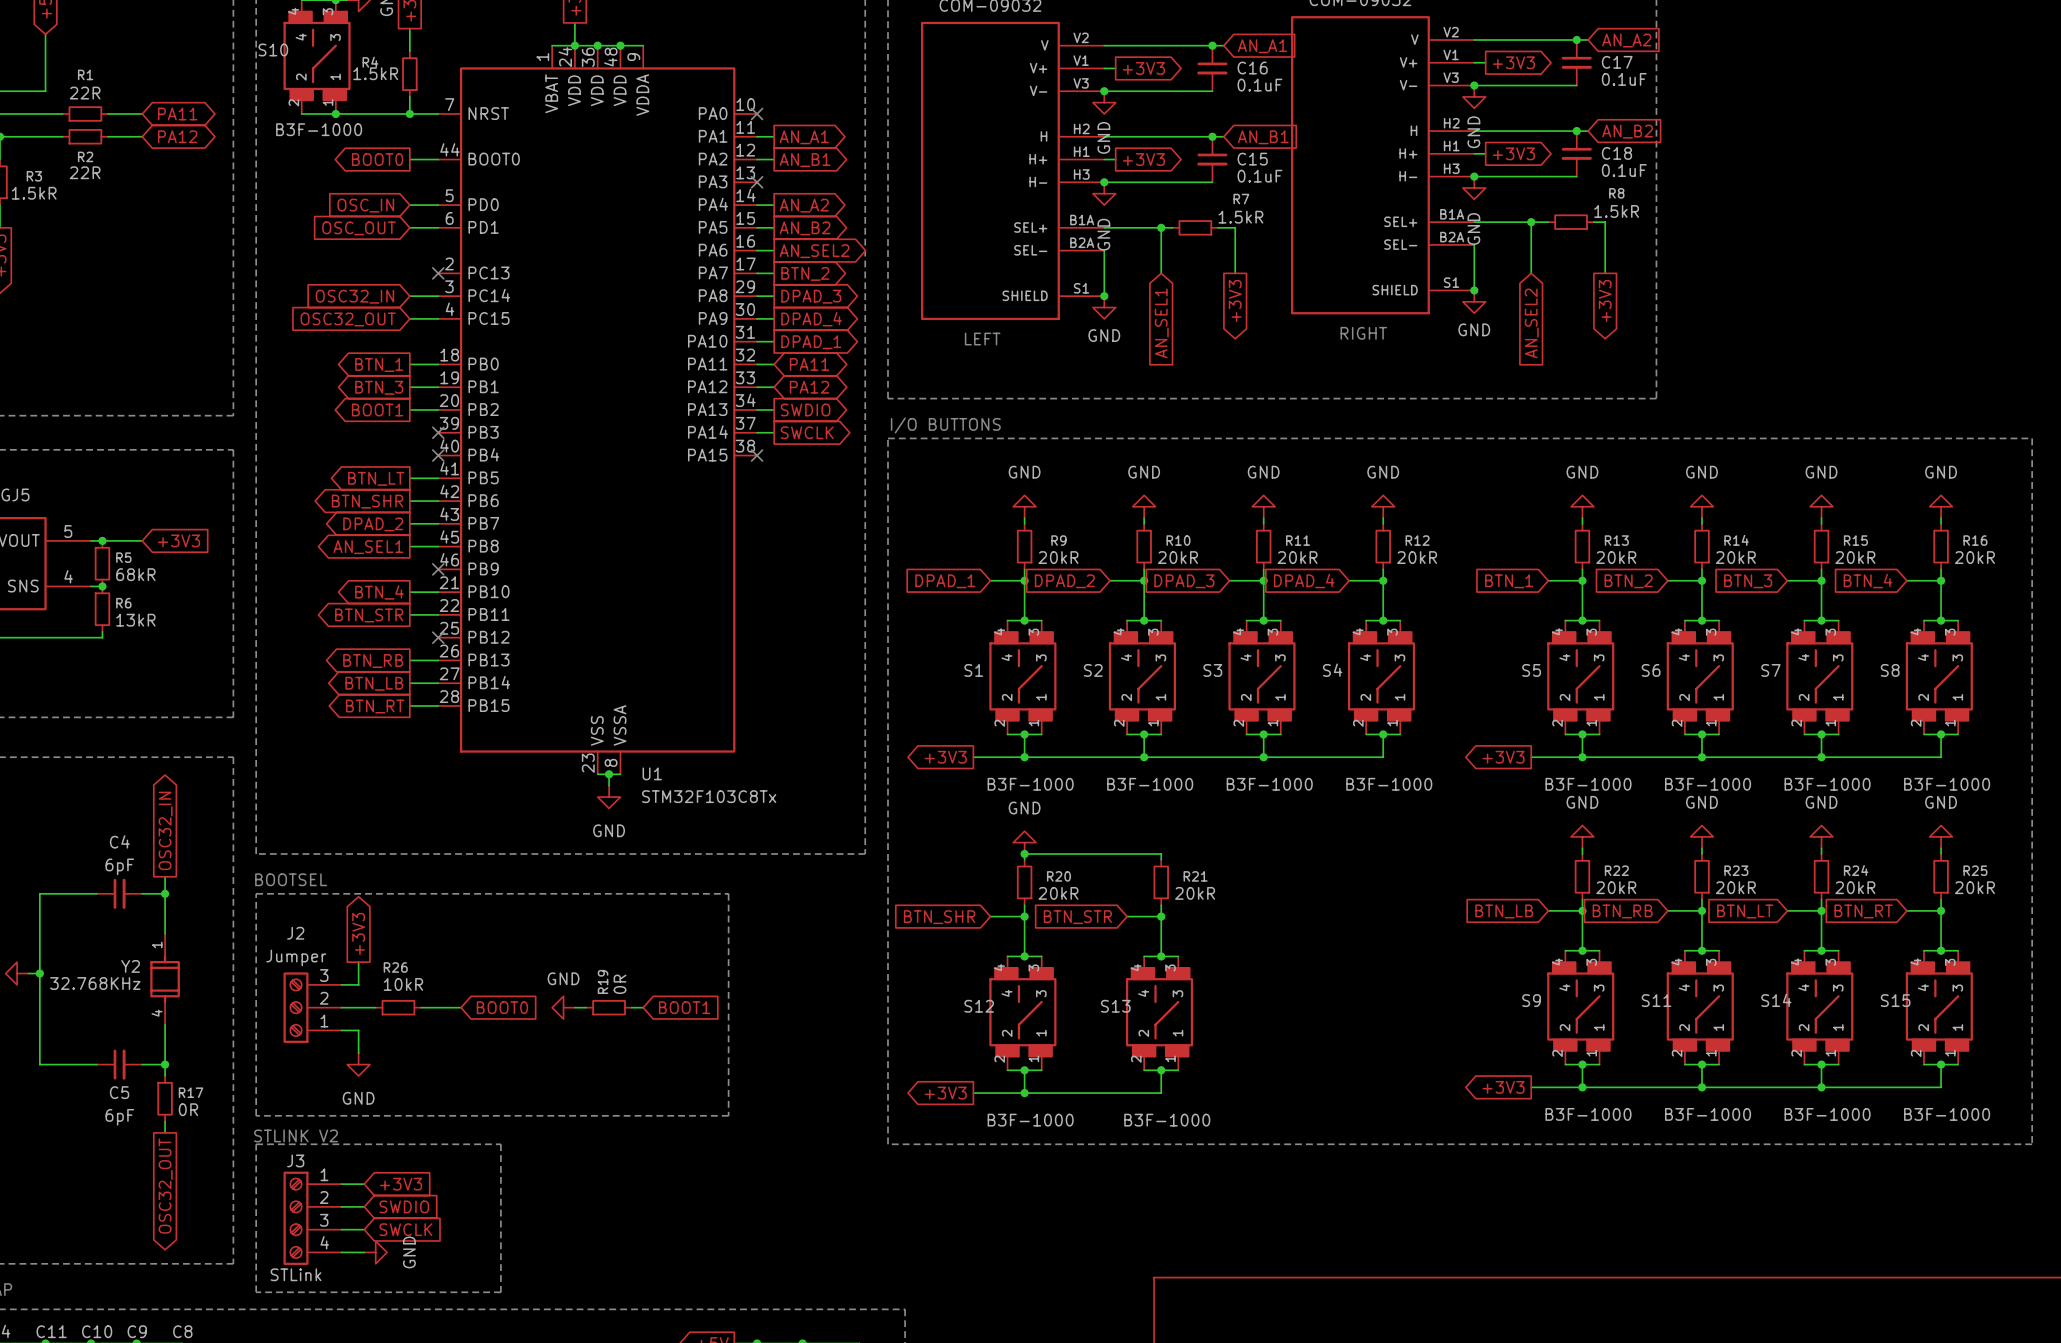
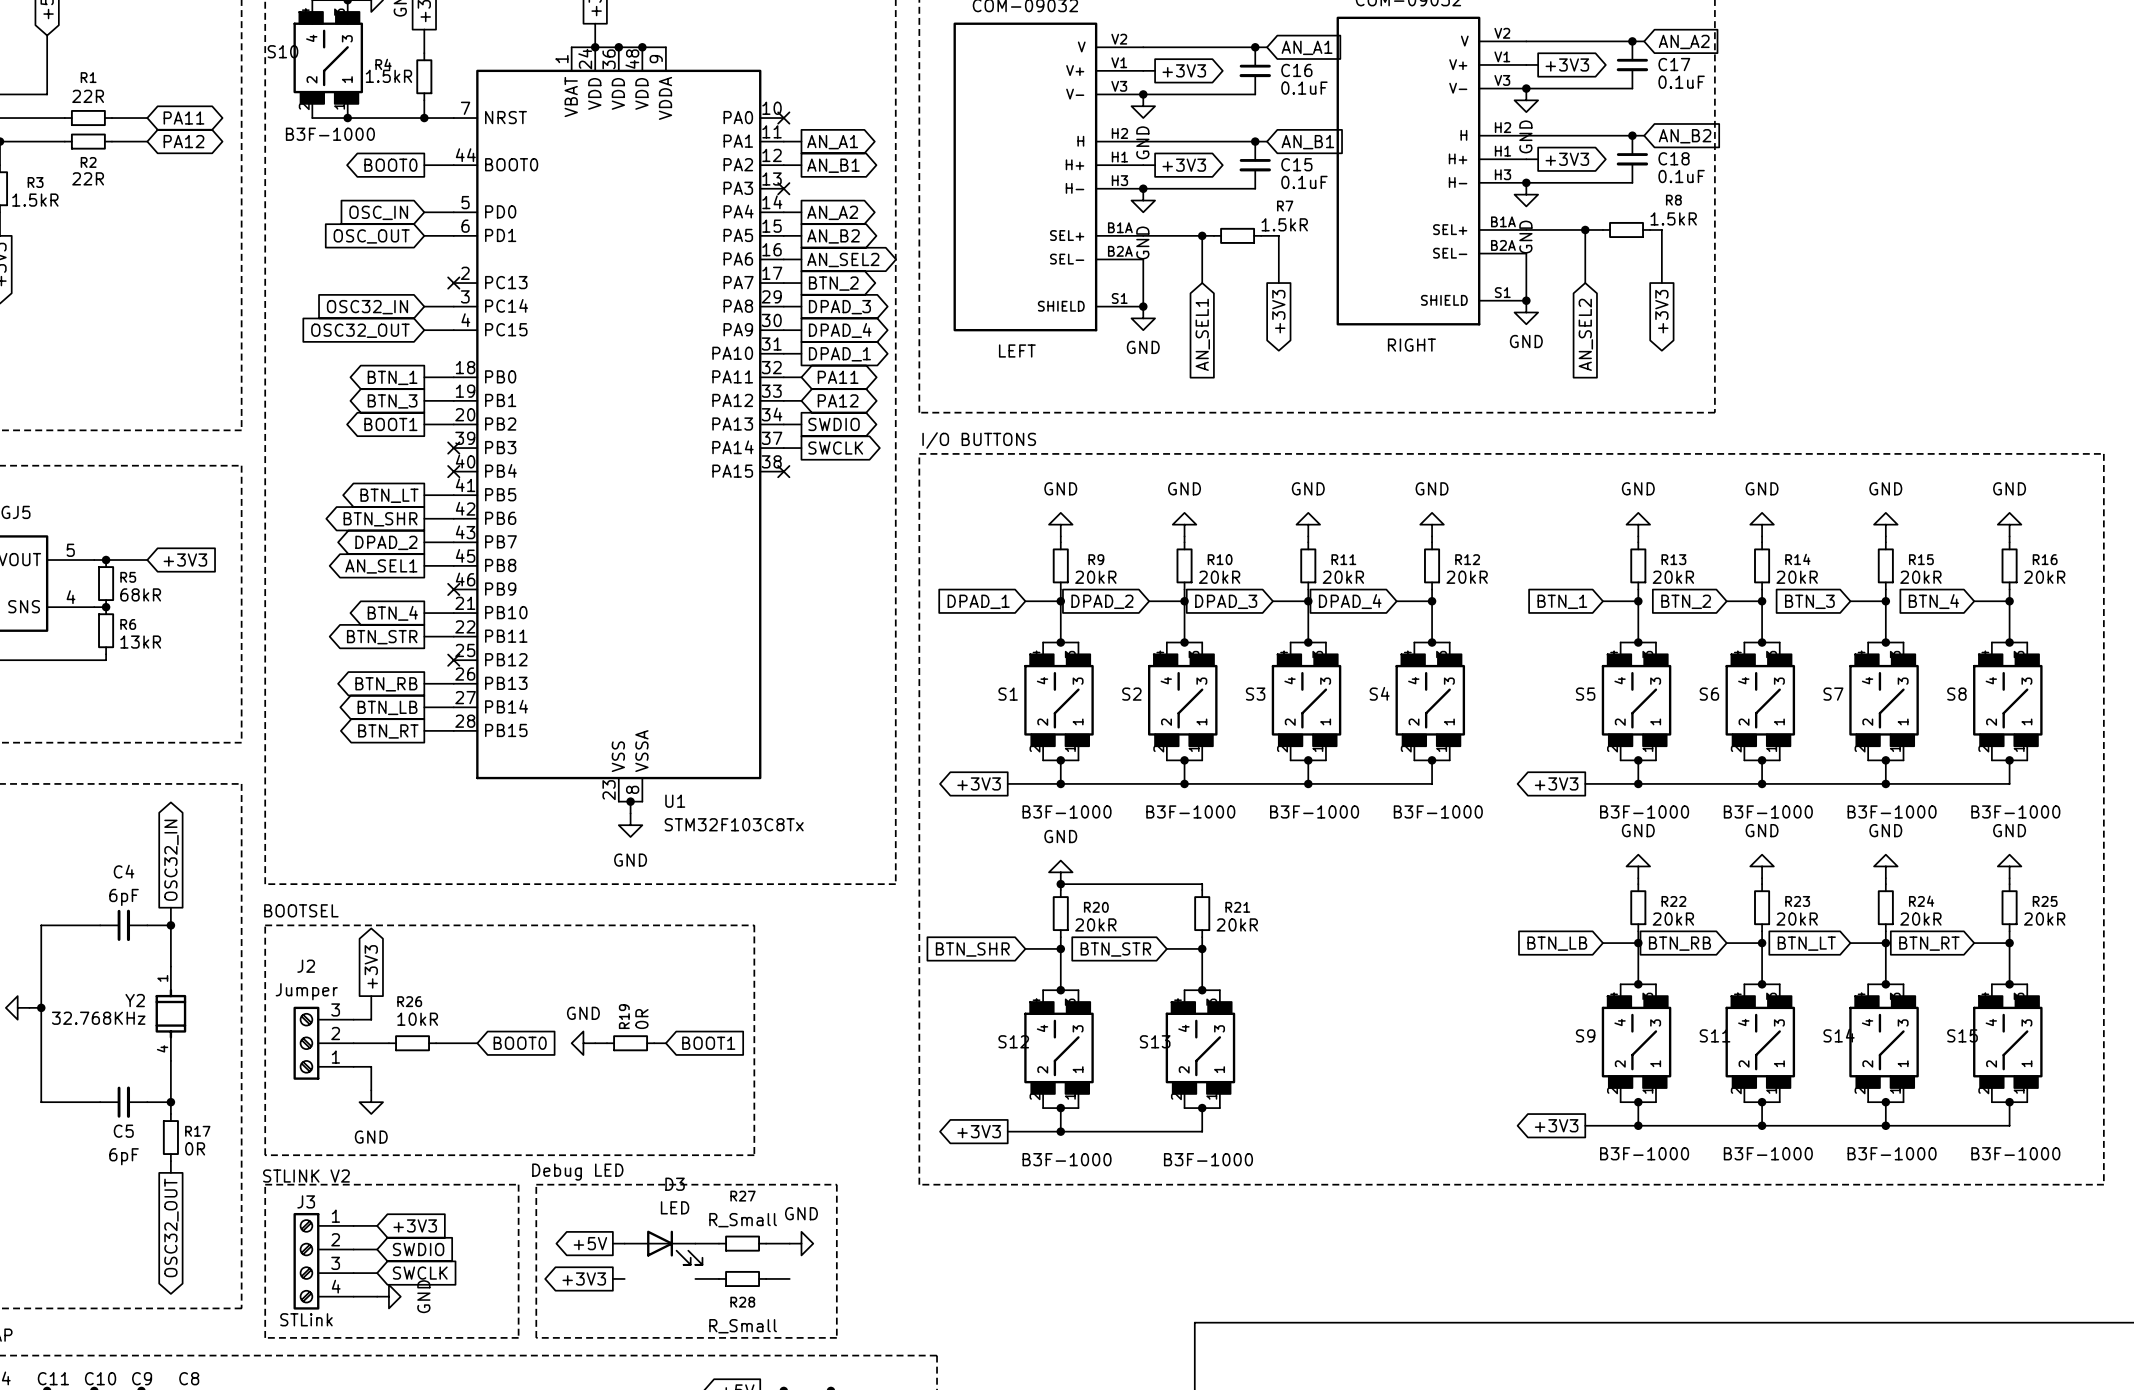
text: none -> Debug LED (577, 1172)
line: none -> (536, 1184) (836, 1184) (836, 1337) (536, 1337) (536, 1184)
global label: none -> +5V (590, 1243)
wire: none -> (612, 1243) (624, 1243)
wire: none -> (695, 1243) (718, 1243)
R27: none -> R_Small (742, 1243)
wire: none -> (766, 1243) (789, 1243)
power symbol: none -> GND (801, 1243)
D3: none -> LED (663, 1247)
global label: none -> +3V3 (584, 1278)
wire: none -> (612, 1278) (624, 1278)
wire: none -> (695, 1278) (718, 1278)
R28: none -> R_Small (742, 1278)
wire: none -> (766, 1278) (789, 1278)

